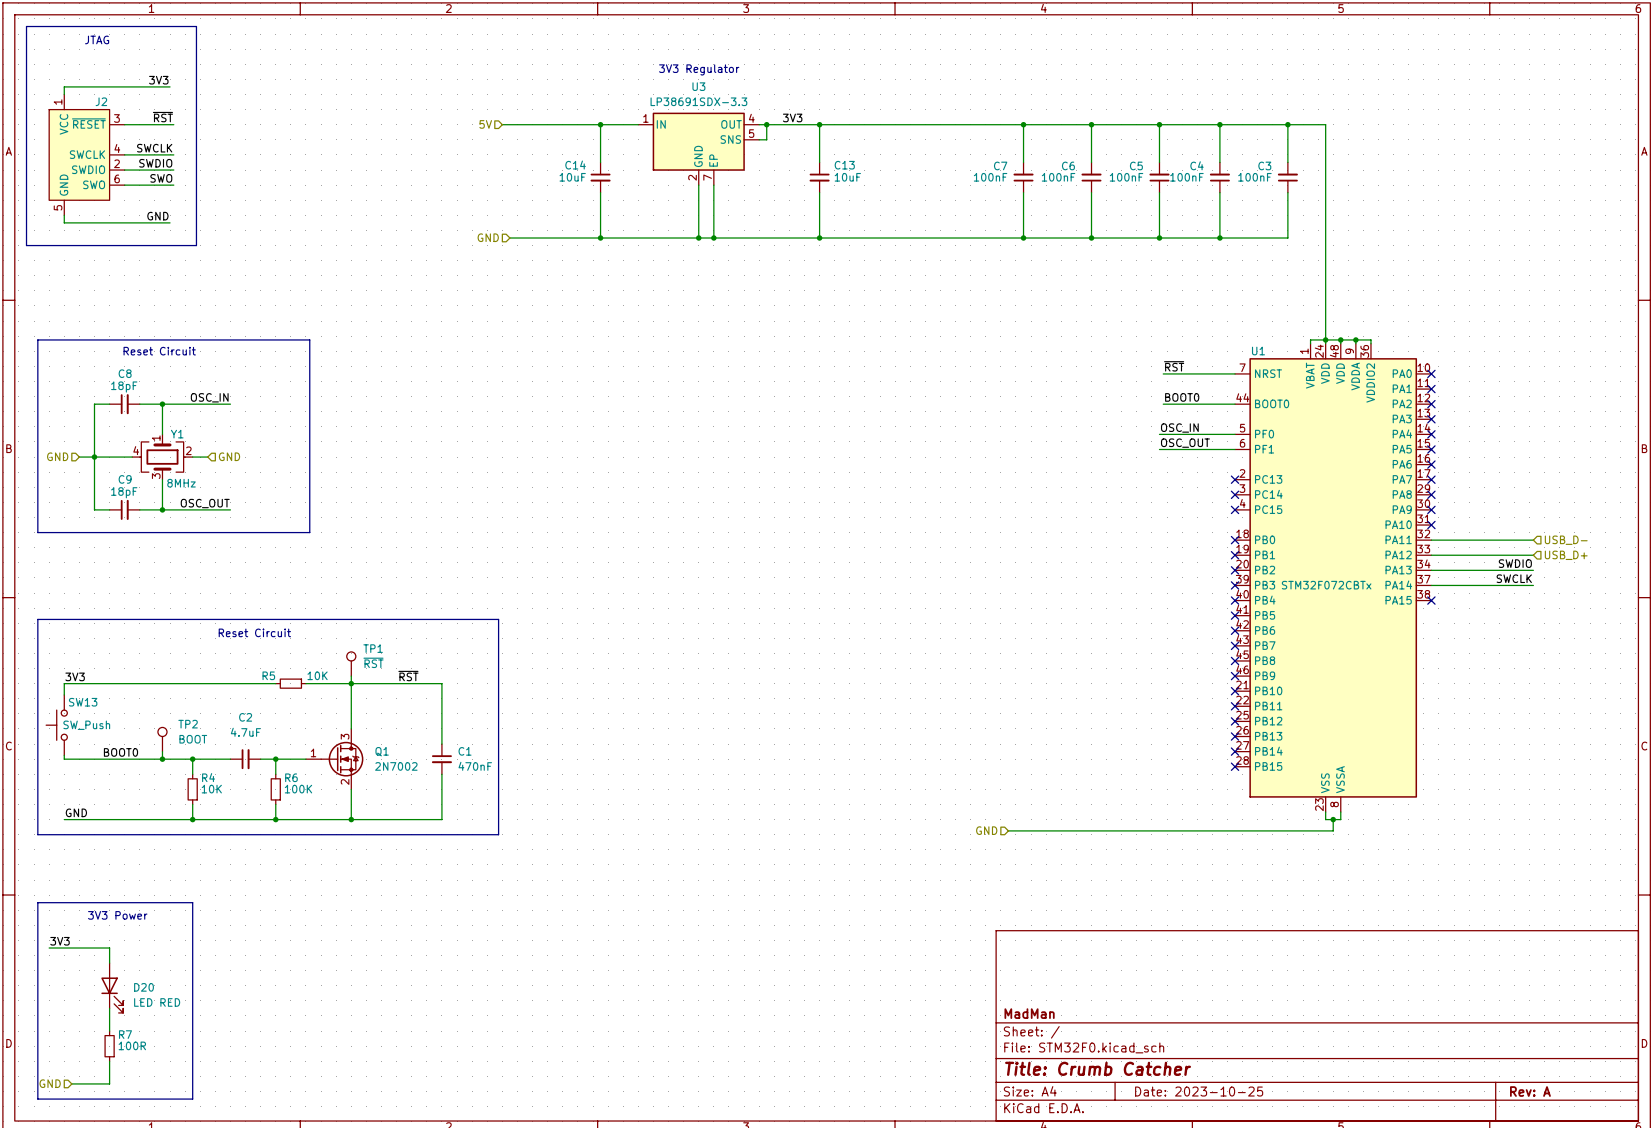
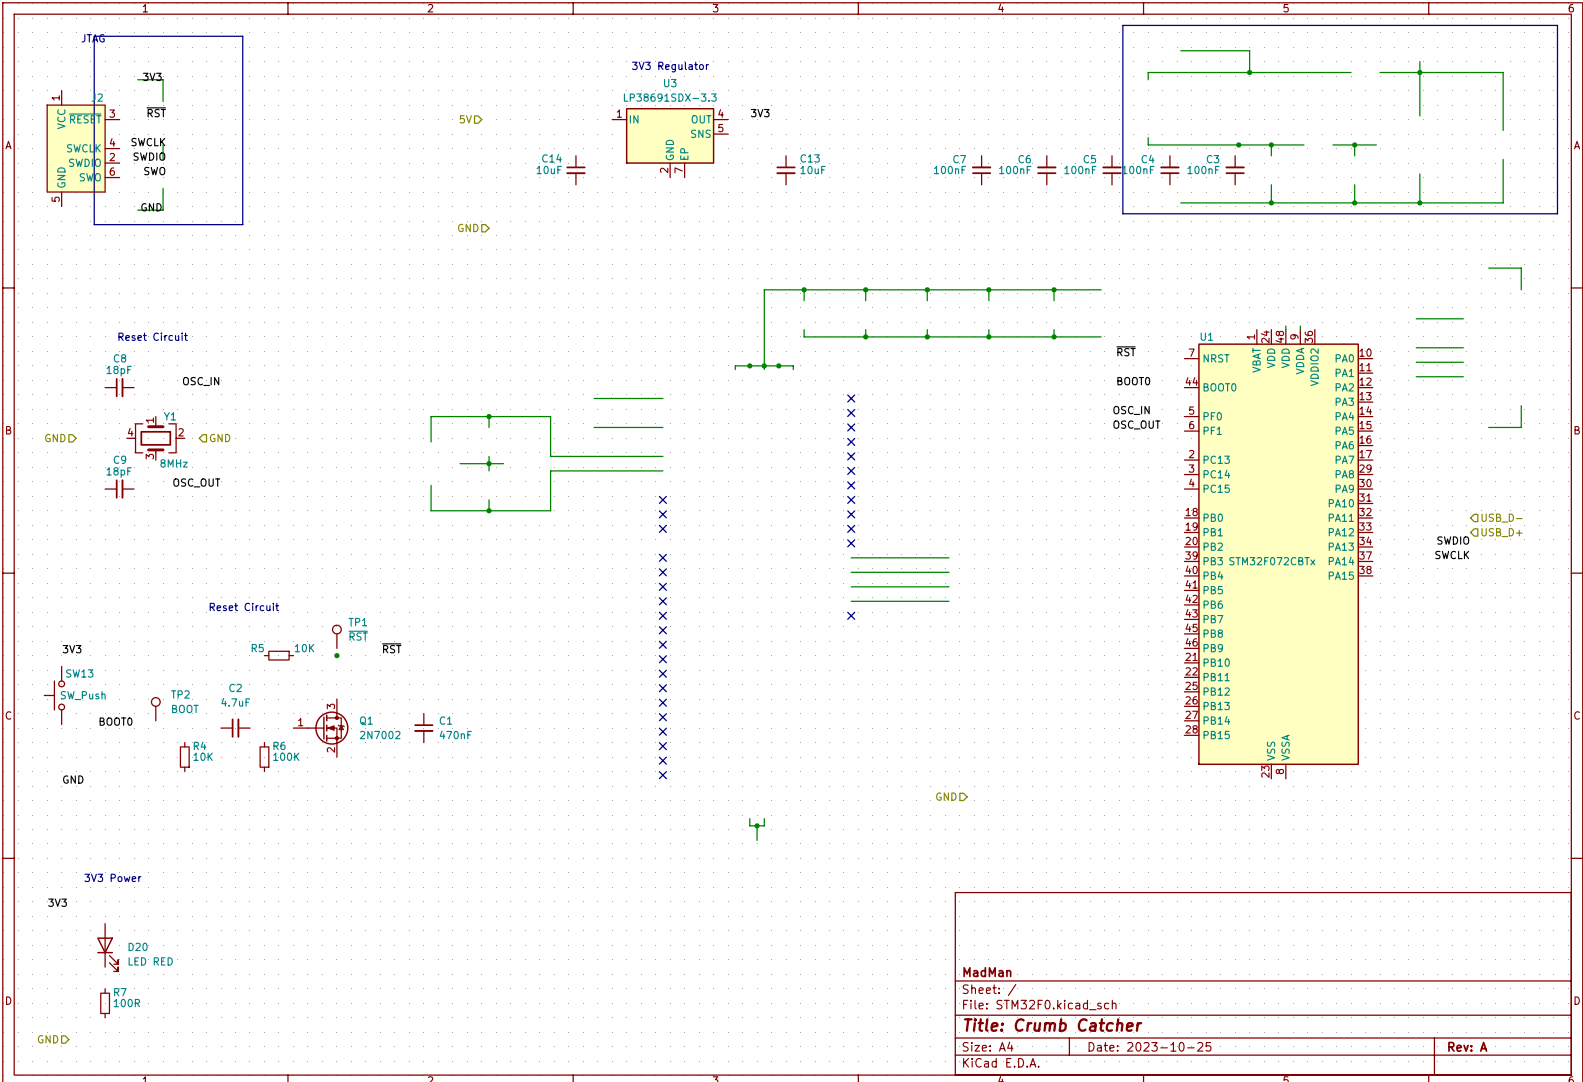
line: (26, 26) (196, 26) (196, 245) (26, 245) (26, 26) -> none
line: none -> (1122, 25) (1557, 25) (1557, 213) (1122, 213) (1122, 25)
line: none -> (94, 36) (242, 36) (242, 224) (94, 224) (94, 36)
wire: none -> (1180, 50) (1249, 50) (1249, 72)
wire: none -> (1419, 61) (1419, 115)
junction: none -> (1249, 72)
wire: none -> (1351, 72) (1148, 72) (1148, 79)
wire: none -> (1380, 72) (1503, 72) (1503, 130)
junction: none -> (1419, 72)
wire: none -> (137, 79) (163, 79) (163, 101)
wire: (170, 86) (64, 86) (64, 94) -> none
wire: (124, 124) (173, 124) -> none
wire: (502, 124) (638, 124) -> none
wire: (600, 124) (600, 162) -> none
junction: (600, 124) -> none
wire: (759, 124) (1325, 124) (1325, 151) -> none
wire: (766, 124) (766, 139) (759, 139) -> none
junction: (766, 124) -> none
wire: (819, 124) (819, 162) -> none
junction: (819, 124) -> none
wire: (1023, 124) (1023, 162) -> none
junction: (1023, 124) -> none
wire: (1091, 124) (1091, 162) -> none
junction: (1091, 124) -> none
wire: (1159, 124) (1159, 162) -> none
junction: (1159, 124) -> none
wire: (1219, 124) (1219, 162) -> none
junction: (1219, 124) -> none
wire: (1287, 124) (1287, 162) -> none
junction: (1287, 124) -> none
wire: none -> (1148, 137) (1148, 144) (1303, 144)
wire: none -> (163, 144) (163, 159)
junction: none -> (1238, 144)
junction: none -> (1271, 144)
wire: none -> (1332, 144) (1376, 144)
wire: none -> (1354, 144) (1354, 155)
junction: none -> (1354, 144)
wire: (124, 154) (173, 154) -> none
wire: (1325, 162) (1325, 192) -> none
wire: none -> (1503, 159) (1503, 202) (1180, 202)
wire: (124, 170) (173, 170) -> none
wire: none -> (1419, 173) (1419, 202)
wire: (124, 185) (173, 185) -> none
wire: (698, 185) (698, 238) -> none
wire: (713, 185) (713, 238) -> none
wire: (600, 192) (600, 238) -> none
wire: (819, 192) (819, 238) -> none
wire: (1023, 192) (1023, 238) -> none
wire: (1091, 192) (1091, 238) -> none
wire: (1159, 192) (1159, 238) -> none
wire: (1219, 192) (1219, 238) -> none
wire: (1287, 192) (1287, 238) (509, 238) -> none
wire: none -> (1354, 184) (1354, 202)
wire: none -> (163, 188) (163, 210) (137, 210)
wire: (1325, 211) (1325, 343) -> none
junction: none -> (1271, 202)
junction: none -> (1354, 202)
junction: none -> (1419, 202)
wire: (64, 215) (64, 222) (170, 222) -> none
junction: (600, 238) -> none
junction: (698, 238) -> none
junction: (713, 238) -> none
junction: (819, 238) -> none
junction: (1023, 238) -> none
junction: (1091, 238) -> none
junction: (1159, 238) -> none
junction: (1219, 238) -> none
wire: none -> (1488, 268) (1521, 268) (1521, 289)
wire: none -> (804, 289) (804, 300)
junction: none -> (804, 289)
wire: none -> (865, 289) (865, 300)
junction: none -> (865, 289)
wire: none -> (927, 289) (927, 300)
junction: none -> (927, 289)
wire: none -> (988, 289) (988, 300)
junction: none -> (988, 289)
wire: none -> (1054, 289) (1054, 300)
junction: none -> (1054, 289)
wire: none -> (1101, 289) (764, 289) (764, 369)
wire: none -> (1416, 318) (1463, 318)
line: (37, 339) (309, 339) (309, 532) (37, 532) (37, 339) -> none
junction: (1325, 339) -> none
junction: (1340, 339) -> none
junction: (1355, 339) -> none
wire: none -> (804, 329) (804, 336) (1101, 336)
wire: none -> (865, 329) (865, 336)
wire: none -> (927, 329) (927, 336)
wire: none -> (988, 329) (988, 336)
wire: none -> (1054, 329) (1054, 336)
wire: (1310, 343) (1310, 339) (1370, 339) (1370, 343) -> none
junction: none -> (865, 336)
junction: none -> (927, 336)
junction: none -> (988, 336)
junction: none -> (1054, 336)
wire: none -> (1416, 347) (1463, 347)
wire: (1163, 373) (1235, 373) -> none
no-connect mark: (1431, 373) -> none
wire: none -> (1416, 362) (1463, 362)
junction: none -> (749, 365)
junction: none -> (764, 365)
junction: none -> (778, 365)
wire: none -> (735, 369) (735, 365) (793, 365) (793, 369)
no-connect mark: (1431, 389) -> none
wire: none -> (1416, 376) (1463, 376)
wire: (109, 404) (94, 404) (94, 509) (109, 509) -> none
wire: (139, 404) (230, 404) -> none
wire: (162, 404) (162, 434) -> none
junction: (162, 404) -> none
wire: (1163, 404) (1235, 404) -> none
no-connect mark: (1431, 404) -> none
wire: none -> (594, 398) (662, 398)
no-connect mark: none -> (851, 398)
no-connect mark: (1431, 419) -> none
wire: none -> (1521, 405) (1521, 427) (1488, 427)
no-connect mark: none -> (851, 412)
wire: none -> (489, 416) (489, 427)
junction: none -> (489, 416)
wire: (1159, 434) (1235, 434) -> none
no-connect mark: (1431, 434) -> none
wire: none -> (594, 427) (662, 427)
no-connect mark: none -> (851, 427)
wire: (1159, 449) (1235, 449) -> none
no-connect mark: (1431, 449) -> none
wire: (79, 457) (132, 457) -> none
junction: (94, 457) -> none
wire: (192, 457) (207, 457) -> none
wire: none -> (431, 441) (431, 416) (550, 416) (550, 456) (662, 456)
no-connect mark: none -> (851, 441)
no-connect mark: (1431, 464) -> none
wire: none -> (489, 456) (489, 470)
no-connect mark: none -> (851, 456)
wire: (162, 479) (162, 509) -> none
no-connect mark: (1235, 479) -> none
no-connect mark: (1431, 479) -> none
wire: none -> (460, 463) (503, 463)
junction: none -> (489, 463)
wire: none -> (662, 470) (550, 470) (550, 510) (431, 510) (431, 485)
no-connect mark: none -> (851, 470)
no-connect mark: (1235, 494) -> none
no-connect mark: (1431, 494) -> none
no-connect mark: none -> (851, 485)
wire: (139, 509) (230, 509) -> none
junction: (162, 509) -> none
no-connect mark: (1235, 509) -> none
no-connect mark: (1431, 509) -> none
wire: none -> (489, 499) (489, 510)
no-connect mark: none -> (662, 499)
no-connect mark: none -> (851, 499)
no-connect mark: (1431, 525) -> none
junction: none -> (489, 510)
no-connect mark: none -> (662, 514)
no-connect mark: none -> (851, 514)
no-connect mark: (1235, 540) -> none
wire: (1431, 540) (1533, 540) -> none
no-connect mark: none -> (662, 528)
no-connect mark: none -> (851, 528)
no-connect mark: (1235, 555) -> none
wire: (1431, 555) (1533, 555) -> none
no-connect mark: none -> (851, 543)
no-connect mark: (1235, 570) -> none
wire: (1431, 570) (1533, 570) -> none
no-connect mark: none -> (662, 557)
wire: none -> (851, 557) (949, 557)
no-connect mark: (1235, 585) -> none
wire: (1431, 585) (1533, 585) -> none
no-connect mark: none -> (662, 572)
wire: none -> (851, 572) (949, 572)
no-connect mark: (1235, 600) -> none
no-connect mark: (1431, 600) -> none
no-connect mark: none -> (662, 586)
wire: none -> (851, 586) (949, 586)
no-connect mark: (1235, 615) -> none
line: (37, 619) (37, 834) (498, 834) (498, 619) (37, 619) -> none
no-connect mark: none -> (662, 601)
wire: none -> (851, 601) (949, 601)
no-connect mark: (1235, 630) -> none
no-connect mark: none -> (662, 615)
no-connect mark: none -> (851, 615)
no-connect mark: (1235, 645) -> none
no-connect mark: none -> (662, 630)
no-connect mark: (1235, 660) -> none
no-connect mark: none -> (662, 644)
wire: (351, 676) (351, 728) -> none
no-connect mark: (1235, 676) -> none
wire: (275, 683) (64, 683) (64, 694) -> none
wire: (305, 683) (441, 683) (441, 744) -> none
no-connect mark: none -> (662, 659)
no-connect mark: (1235, 691) -> none
no-connect mark: none -> (662, 673)
no-connect mark: (1235, 706) -> none
no-connect mark: none -> (662, 688)
no-connect mark: (1235, 721) -> none
no-connect mark: none -> (662, 702)
no-connect mark: (1235, 736) -> none
no-connect mark: none -> (662, 717)
wire: (162, 751) (162, 759) -> none
no-connect mark: (1235, 751) -> none
wire: (64, 755) (64, 759) (230, 759) -> none
junction: (162, 759) -> none
wire: (192, 759) (192, 774) -> none
junction: (192, 759) -> none
wire: (260, 759) (305, 759) -> none
wire: (275, 759) (275, 774) -> none
junction: (275, 759) -> none
no-connect mark: none -> (662, 731)
no-connect mark: (1235, 766) -> none
wire: (441, 774) (441, 819) (64, 819) -> none
no-connect mark: none -> (662, 746)
wire: (351, 789) (351, 819) -> none
no-connect mark: none -> (662, 760)
wire: (192, 804) (192, 819) -> none
wire: (275, 804) (275, 819) -> none
no-connect mark: none -> (662, 775)
wire: (1325, 812) (1325, 819) (1340, 819) (1340, 812) -> none
junction: (192, 819) -> none
junction: (275, 819) -> none
junction: (351, 819) -> none
wire: (1333, 819) (1333, 830) (1008, 830) -> none
junction: (1333, 819) -> none
wire: none -> (749, 818) (749, 825) (764, 825) (764, 818)
wire: none -> (757, 825) (757, 840)
junction: none -> (757, 825)
line: (37, 902) (37, 1099) (192, 1099) (192, 902) (37, 902) -> none
wire: (49, 948) (109, 948) (109, 963) -> none
wire: (109, 1008) (109, 1031) -> none
wire: (109, 1061) (109, 1083) (71, 1083) -> none

